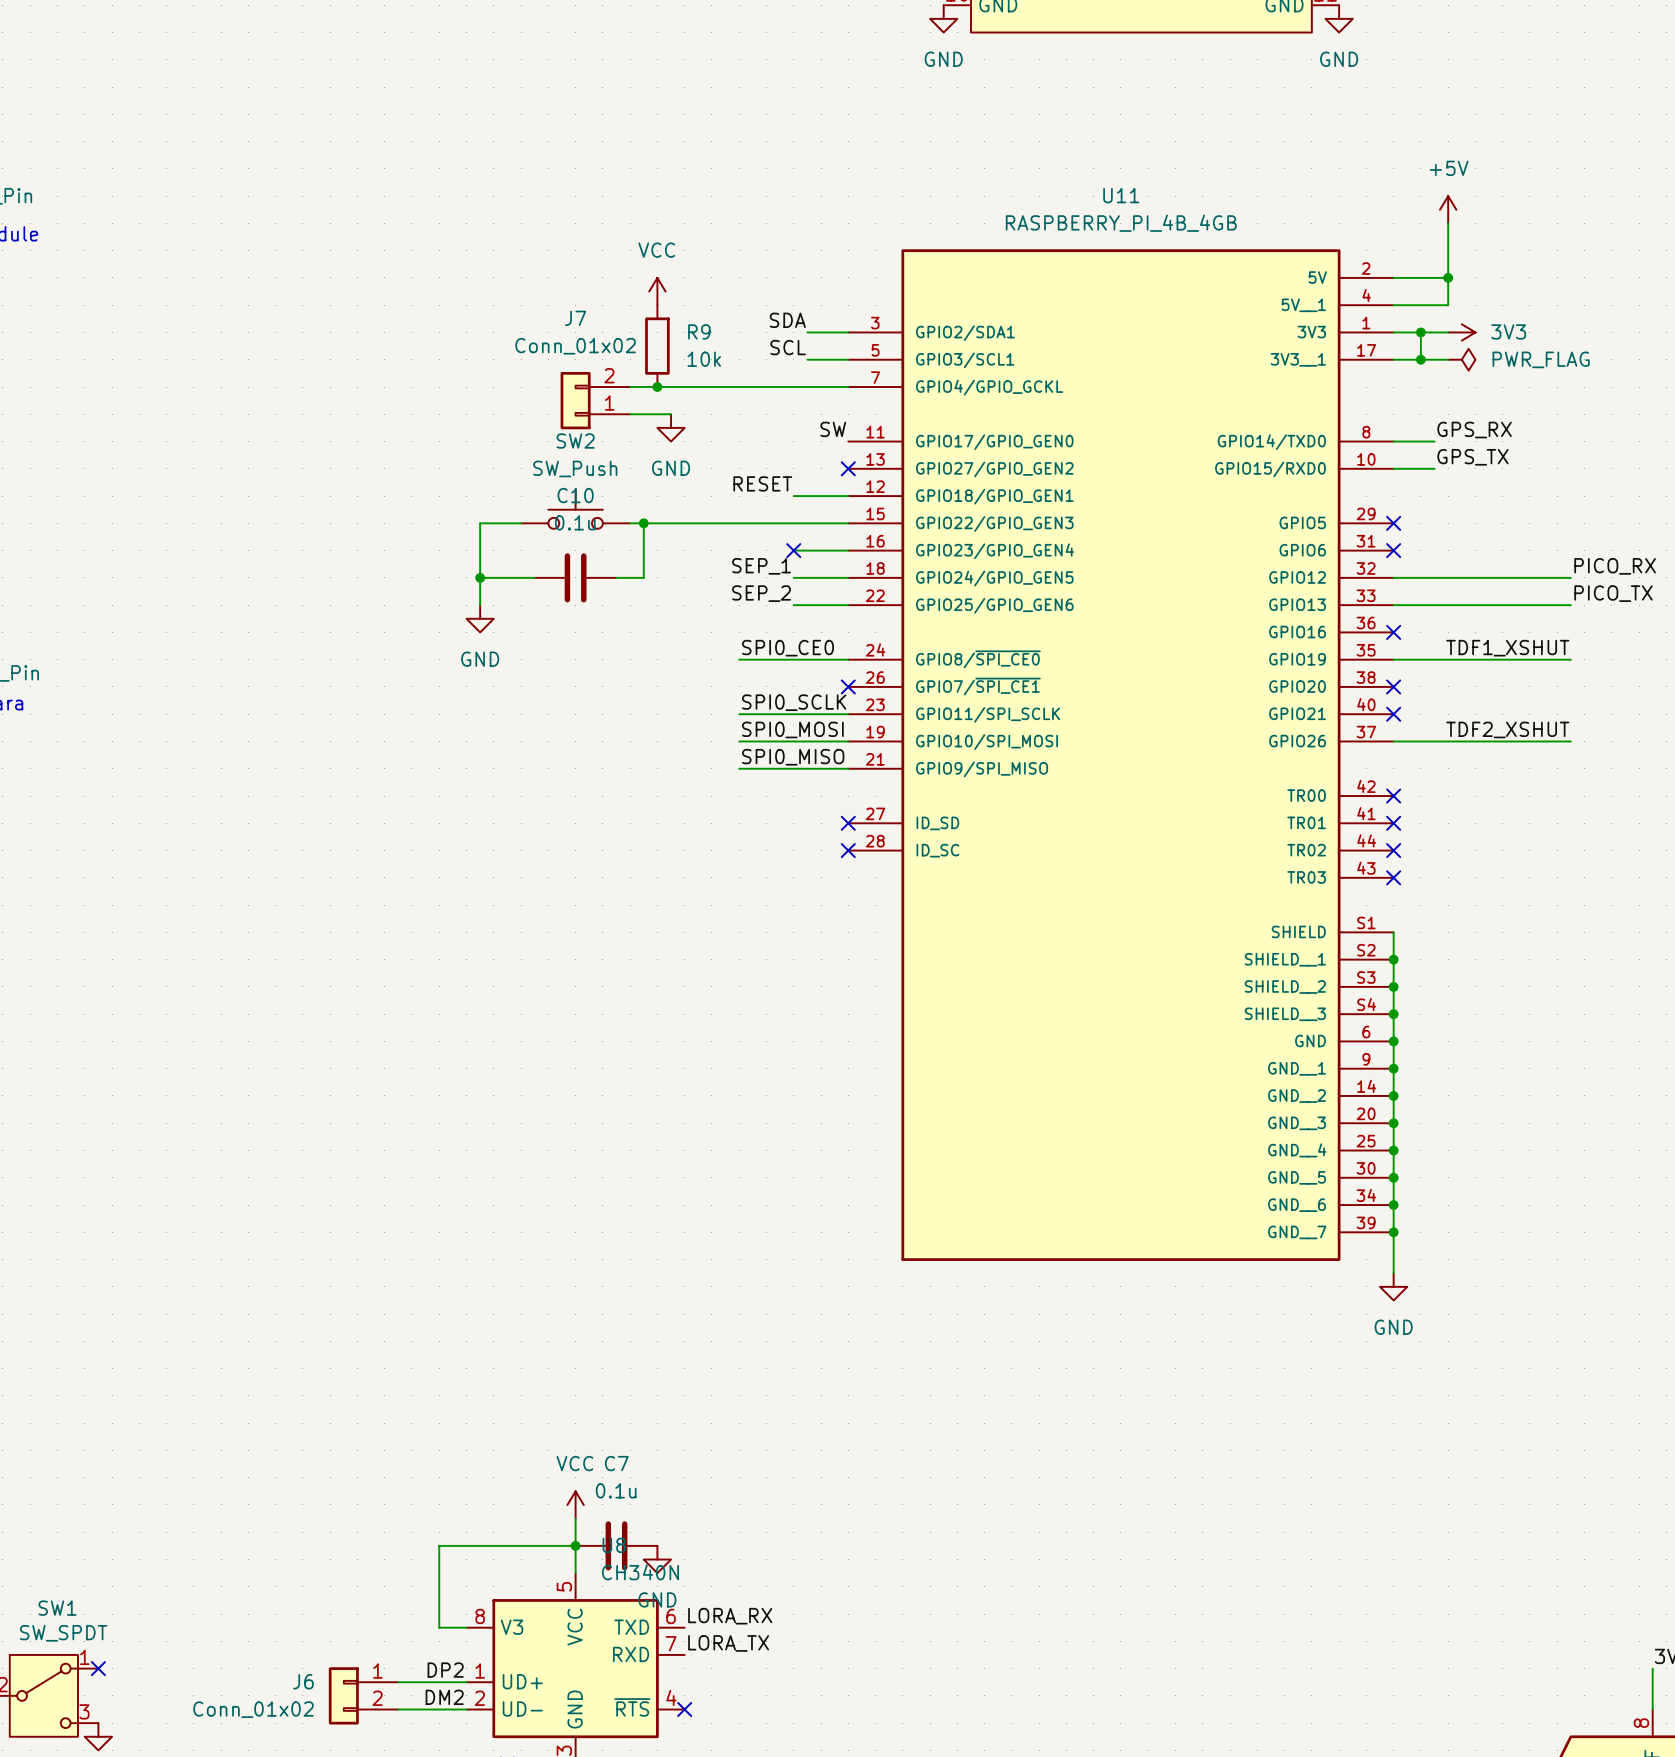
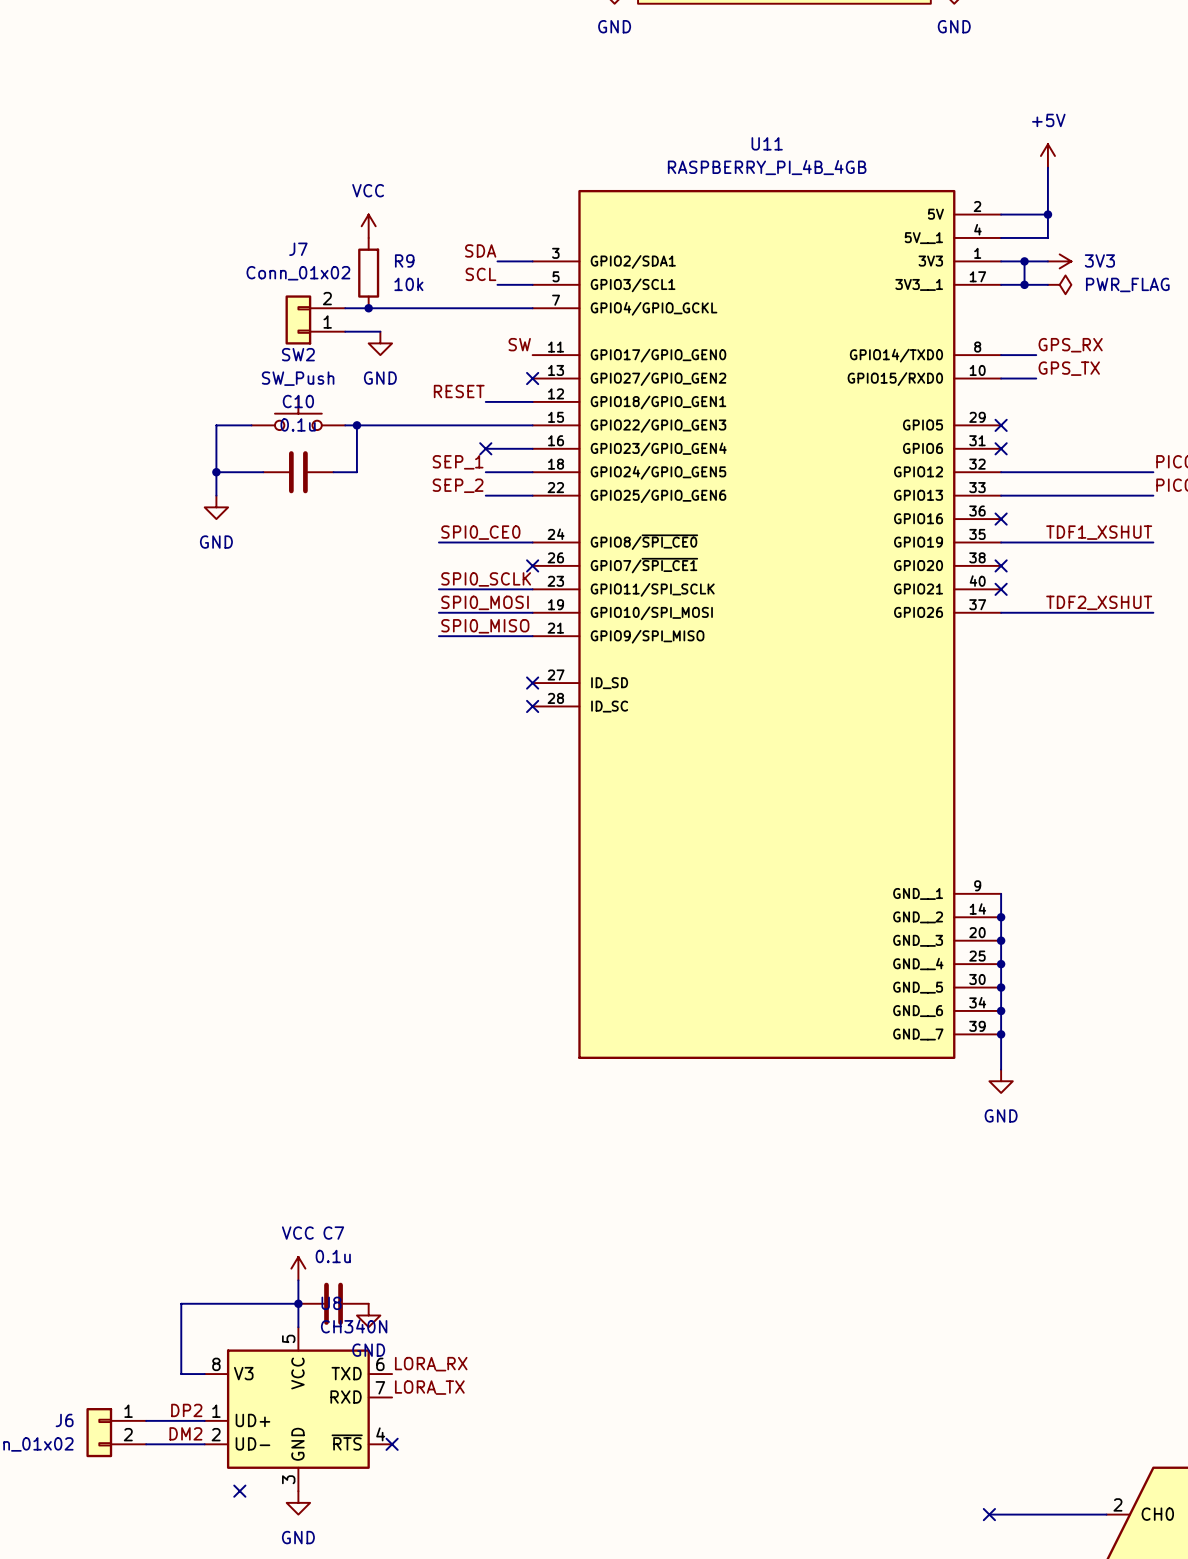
U11 symbol: [848, 249, 1394, 1261] -> [532, 189, 1002, 1059]
no-connect mark: (1393, 796) -> none
no-connect mark: (1393, 823) -> none
no-connect mark: (1393, 850) -> none
no-connect mark: (1393, 877) -> none
wire: (1393, 932) (1393, 1068) -> none
junction: (1393, 959) -> none
junction: (1393, 986) -> none
junction: (1393, 1014) -> none
junction: (1393, 1041) -> none
junction: (1393, 1068) -> none

